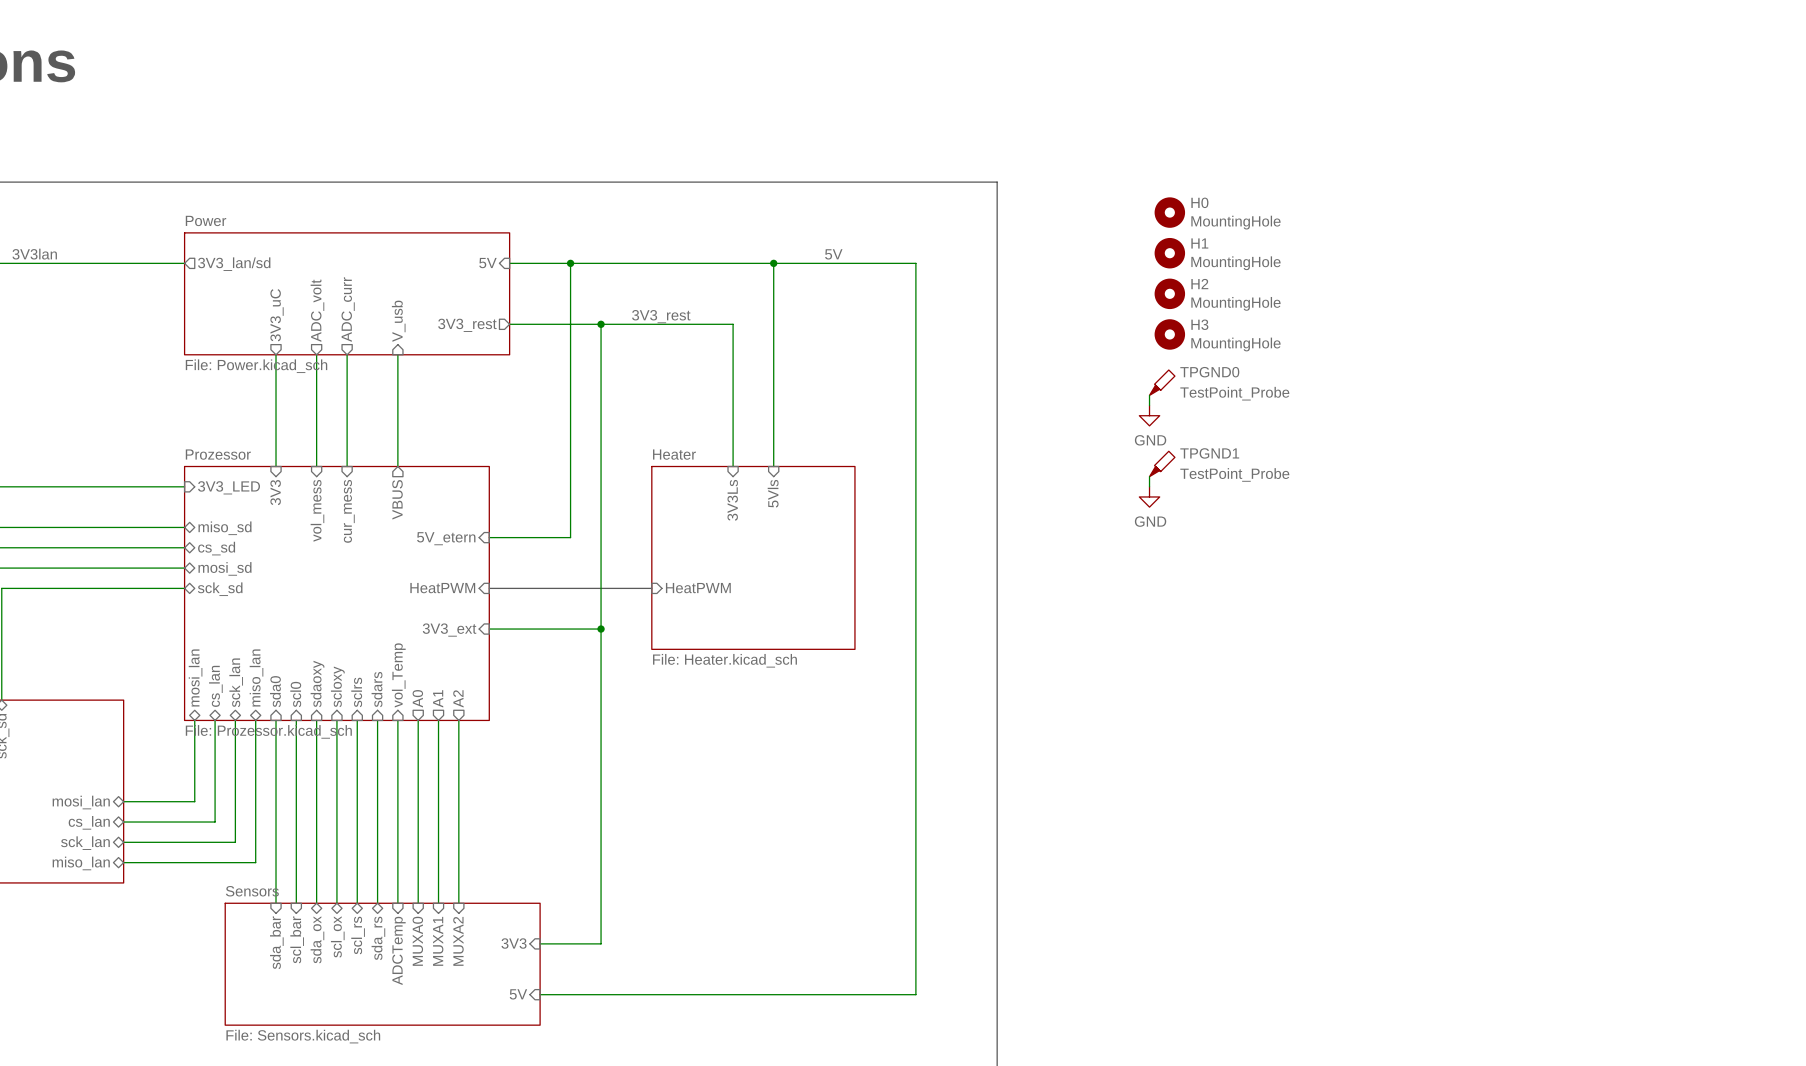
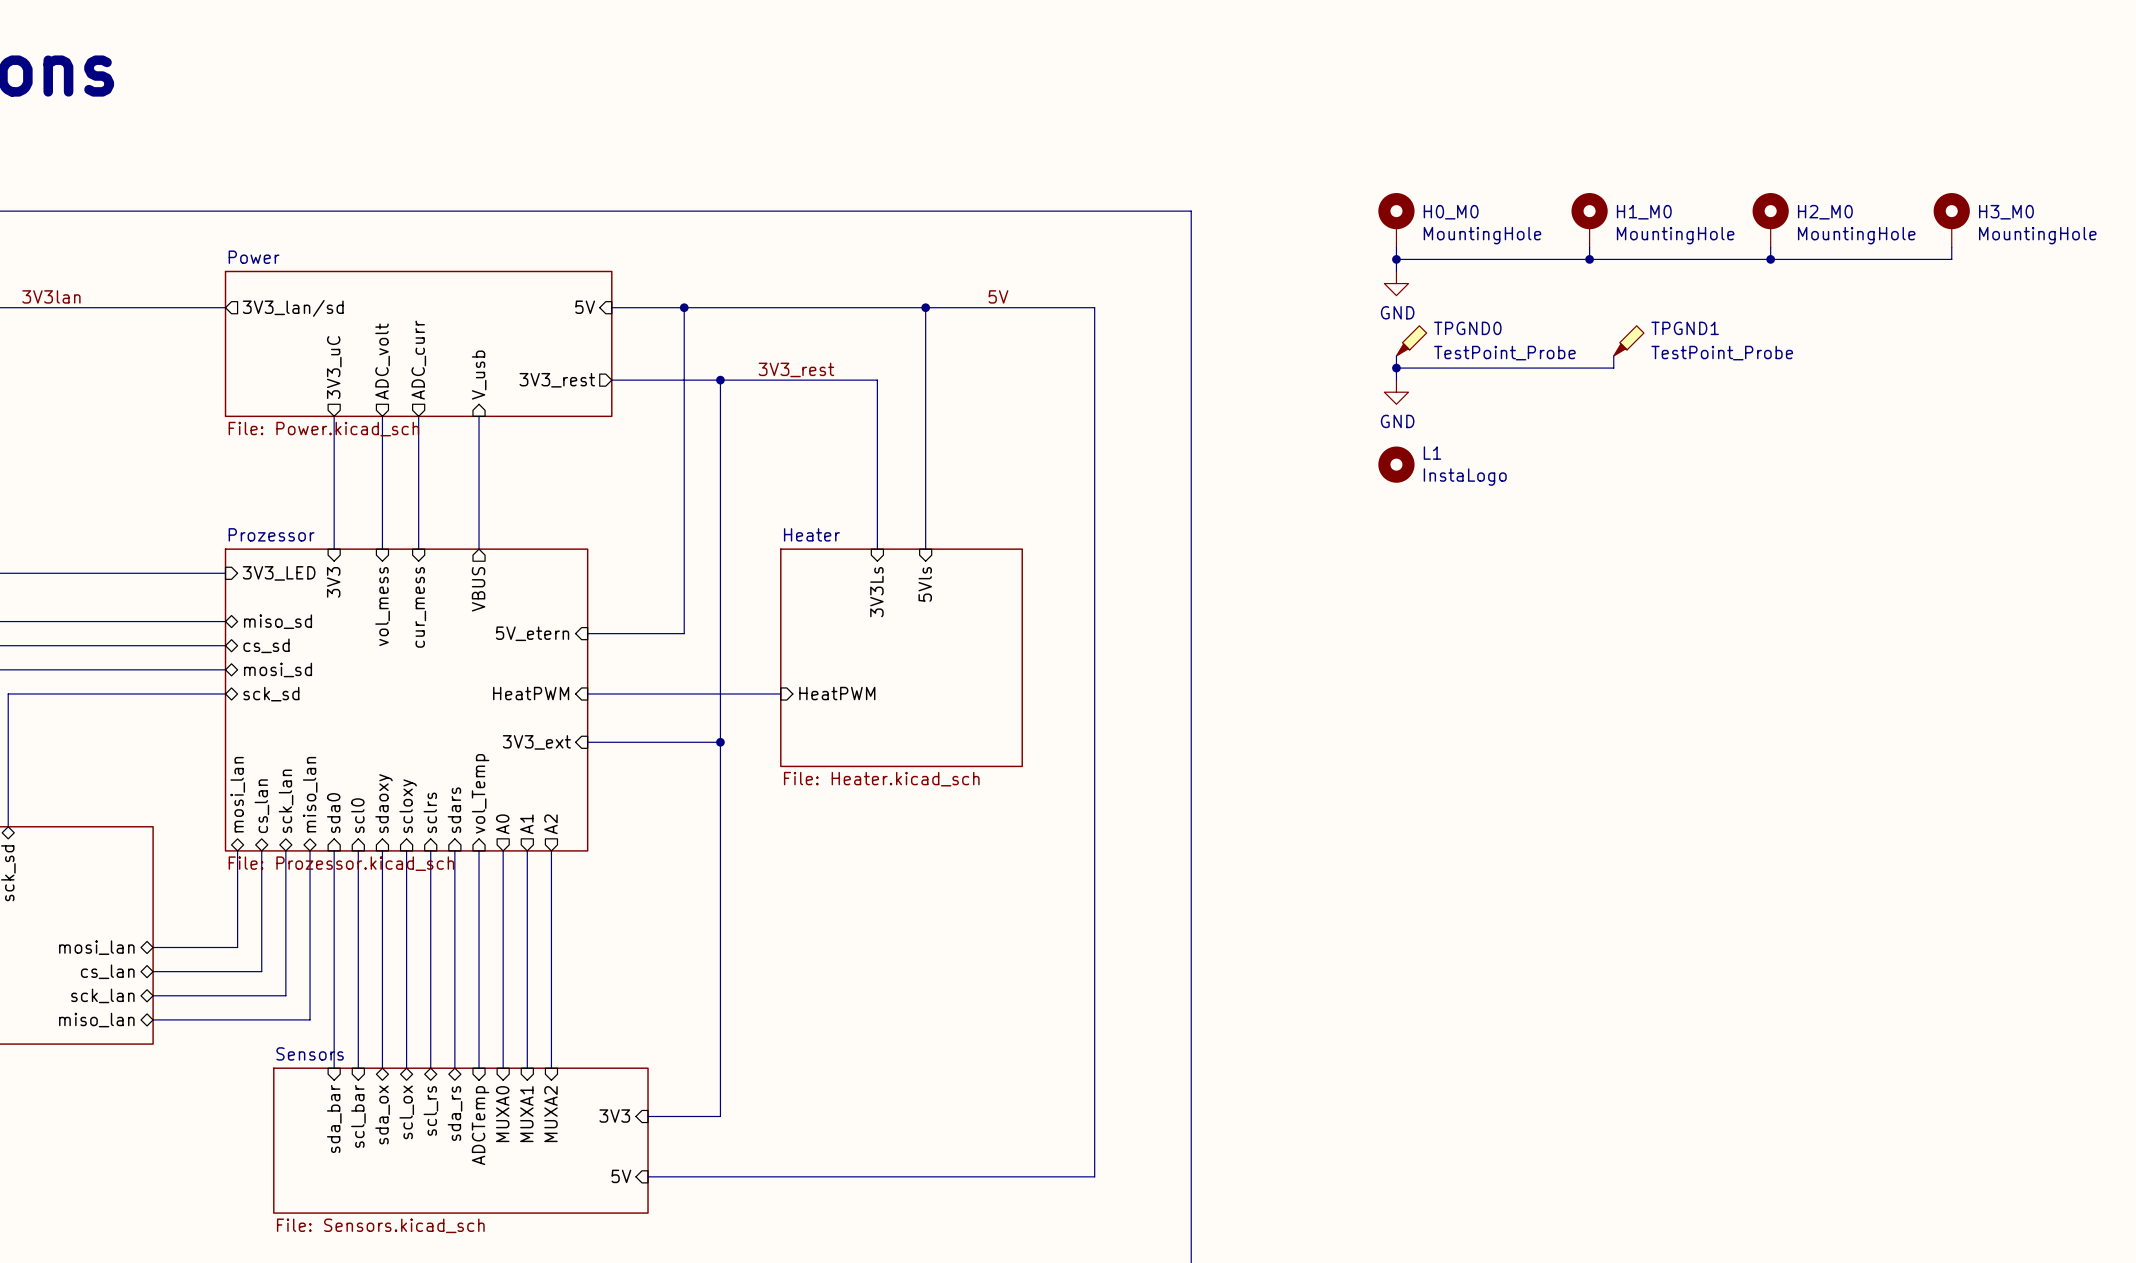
H0_M0: none -> MountingHole (1396, 220)
H1_M0: none -> MountingHole (1589, 220)
H2_M0: none -> MountingHole (1770, 220)
H3_M0: none -> MountingHole (1951, 220)
wire: none -> (1396, 247) (1396, 271)
H0: MountingHole (1169, 212) -> none
wire: none -> (1589, 247) (1589, 259)
wire: none -> (1770, 247) (1770, 259)
wire: none -> (1951, 247) (1951, 259) (1396, 259)
junction: none -> (1396, 259)
junction: none -> (1589, 259)
junction: none -> (1770, 259)
power symbol: none -> GND (1396, 283)
H1: MountingHole (1169, 253) -> none
H2: MountingHole (1169, 293) -> none
wire: none -> (1613, 355) (1613, 368) (1396, 368)
junction: none -> (1396, 368)
H3: MountingHole (1169, 334) -> none
power symbol: none -> GND (1396, 392)
TPGND0 position: (1162, 382) -> (1411, 340)
wire: (1149, 395) (1149, 405) -> none
L1: none -> InstaLogo (1396, 464)
power symbol: GND (1149, 415) -> none
TPGND1 position: (1162, 463) -> (1628, 340)
wire: (1149, 476) (1149, 486) -> none
power symbol: GND (1149, 496) -> none

